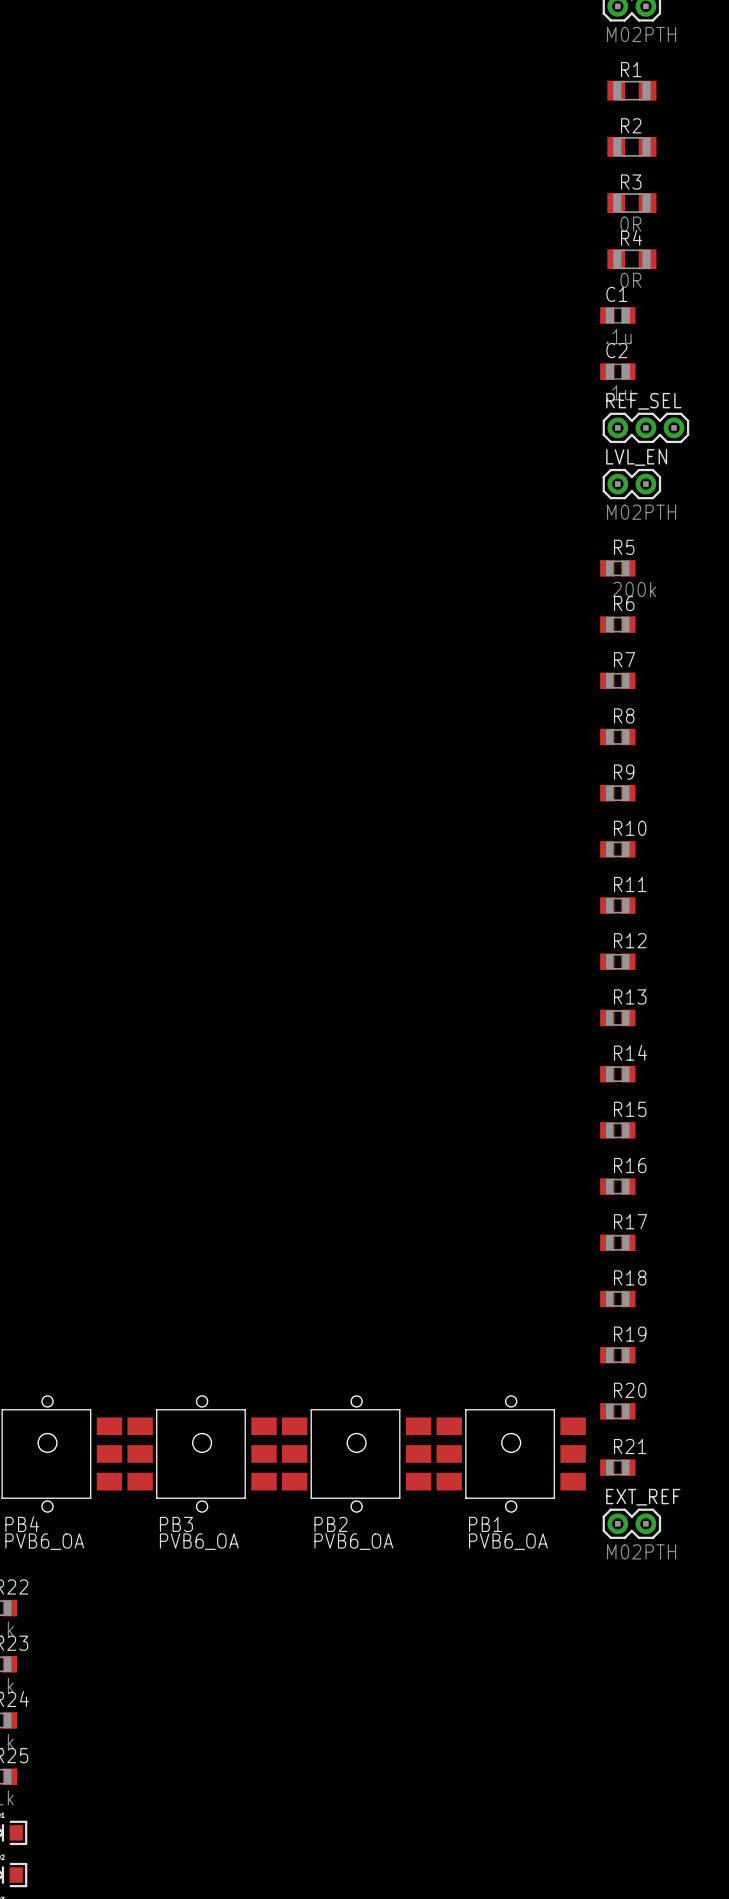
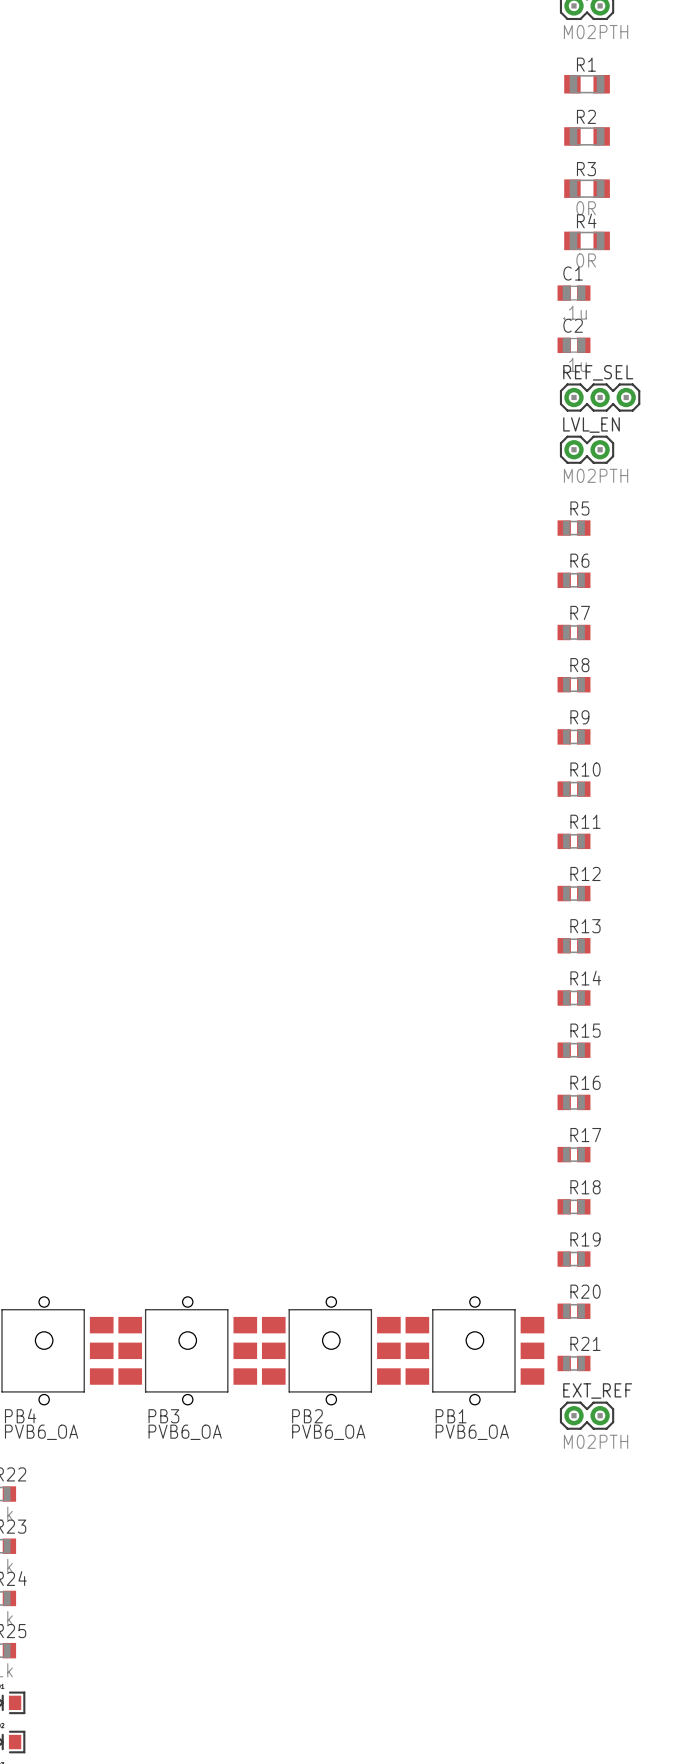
R5 value: 200k (634, 589) -> none

